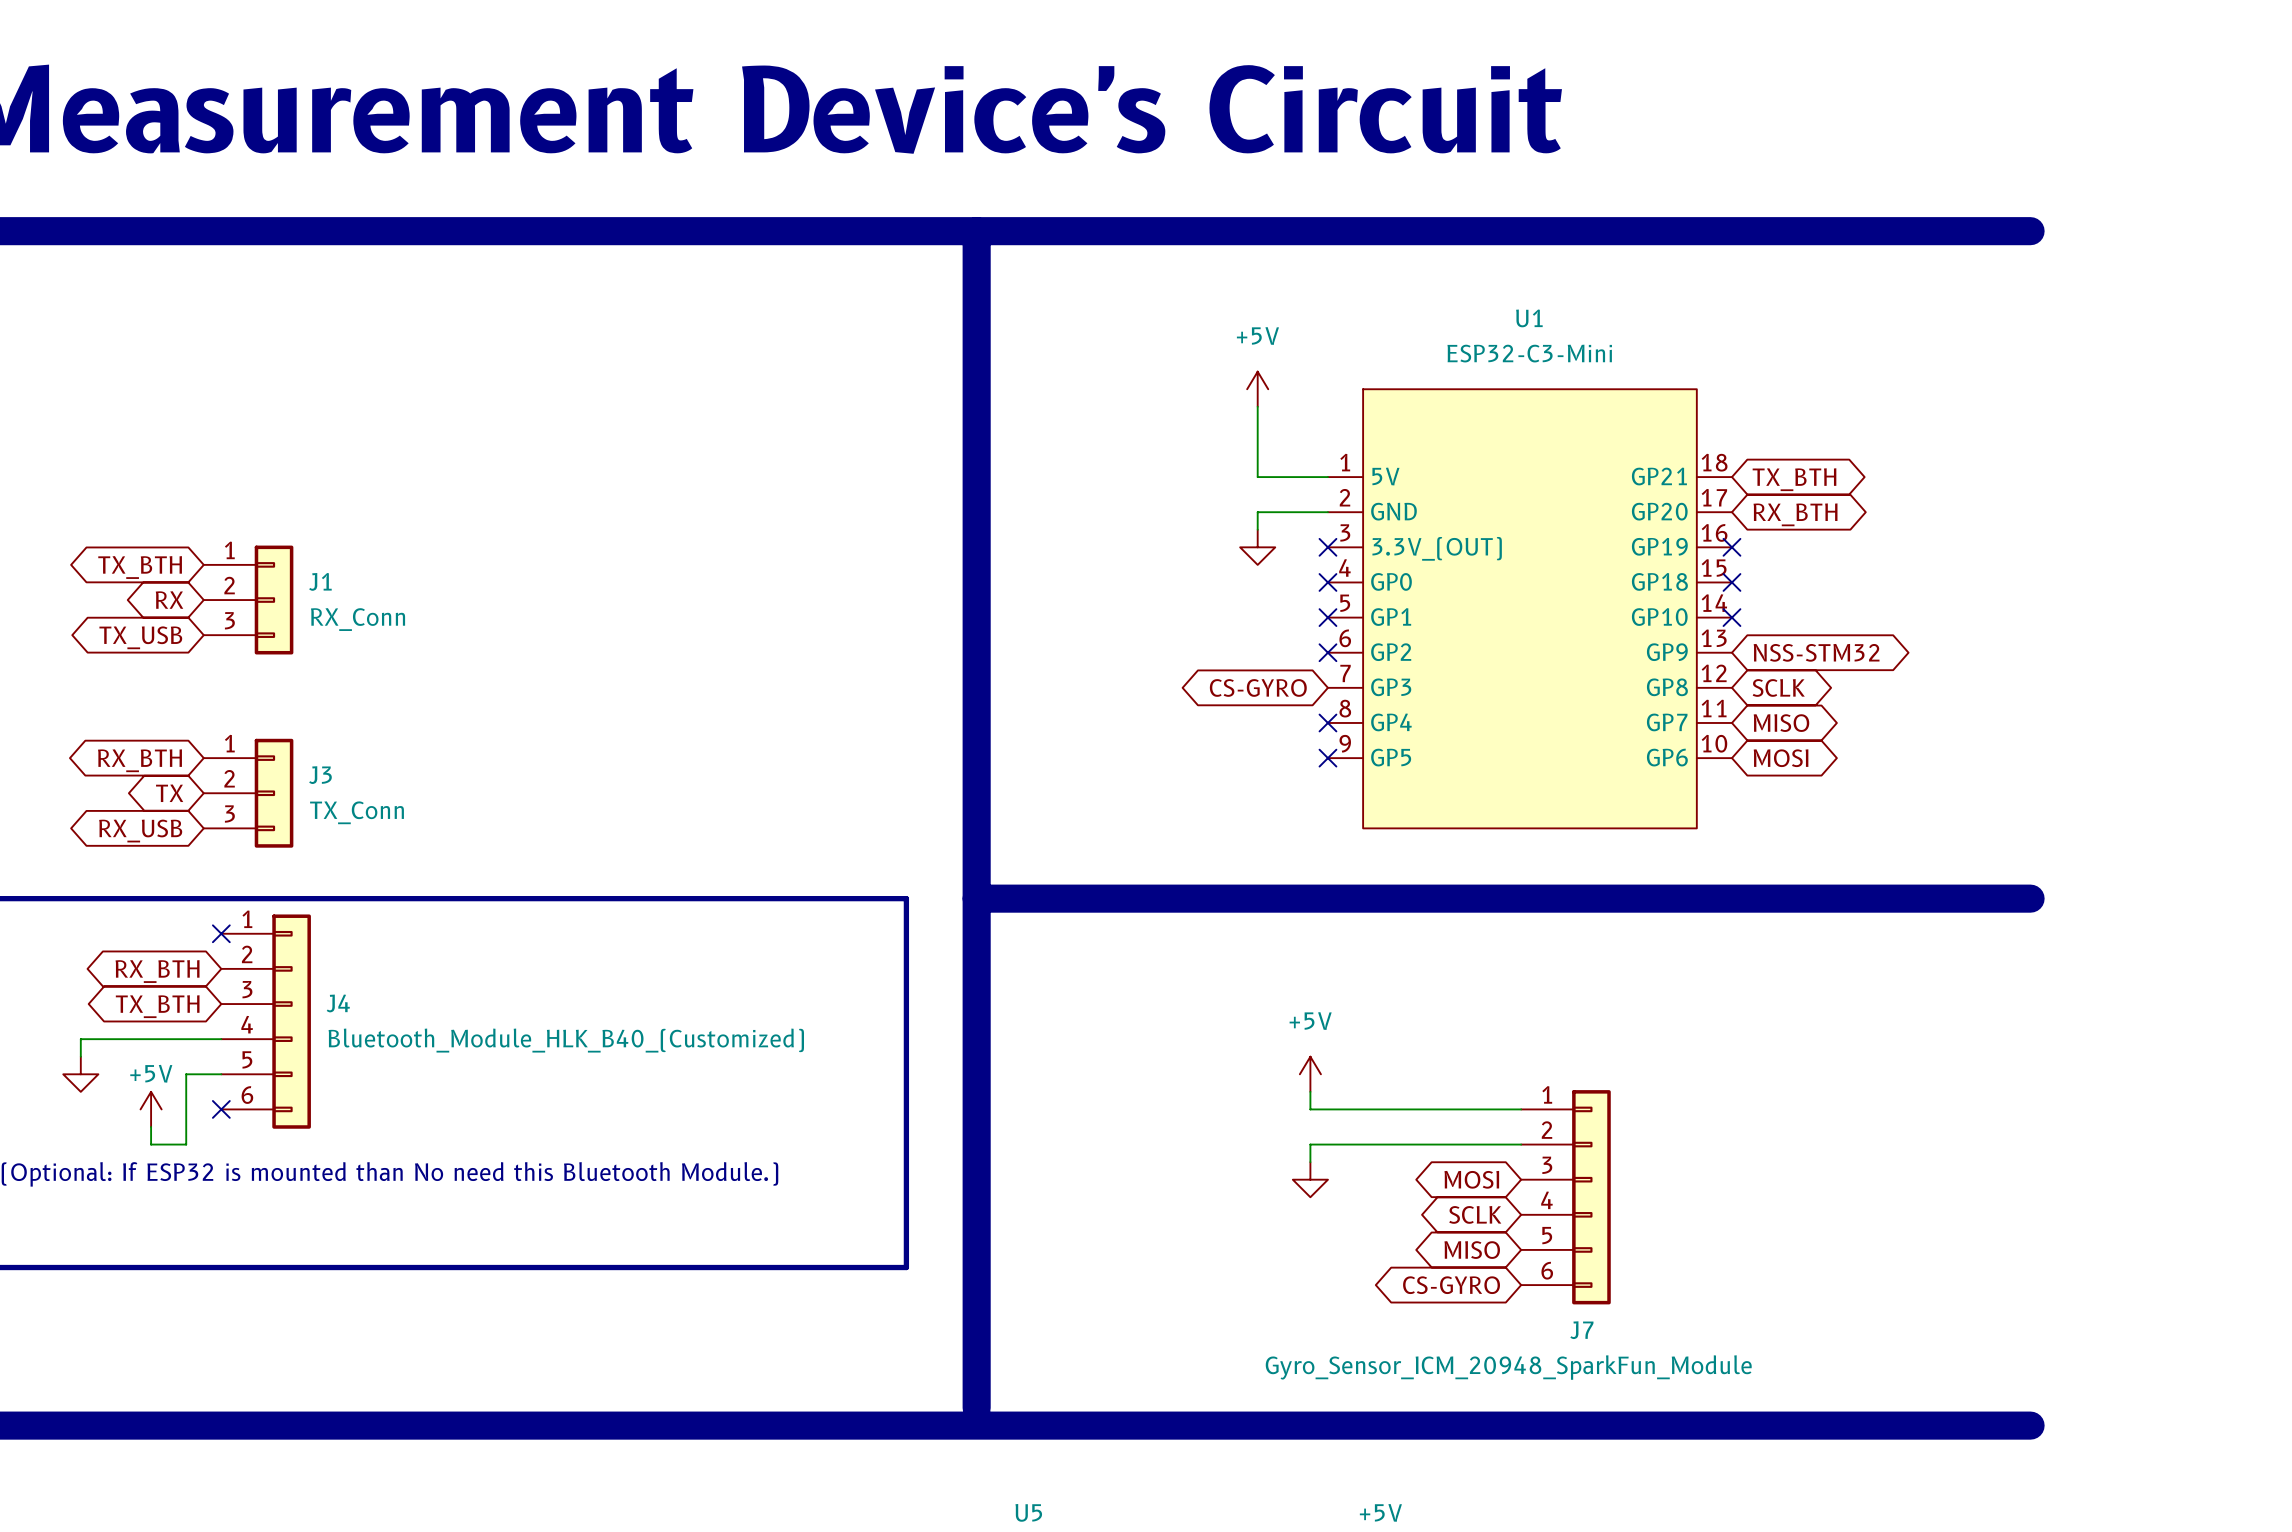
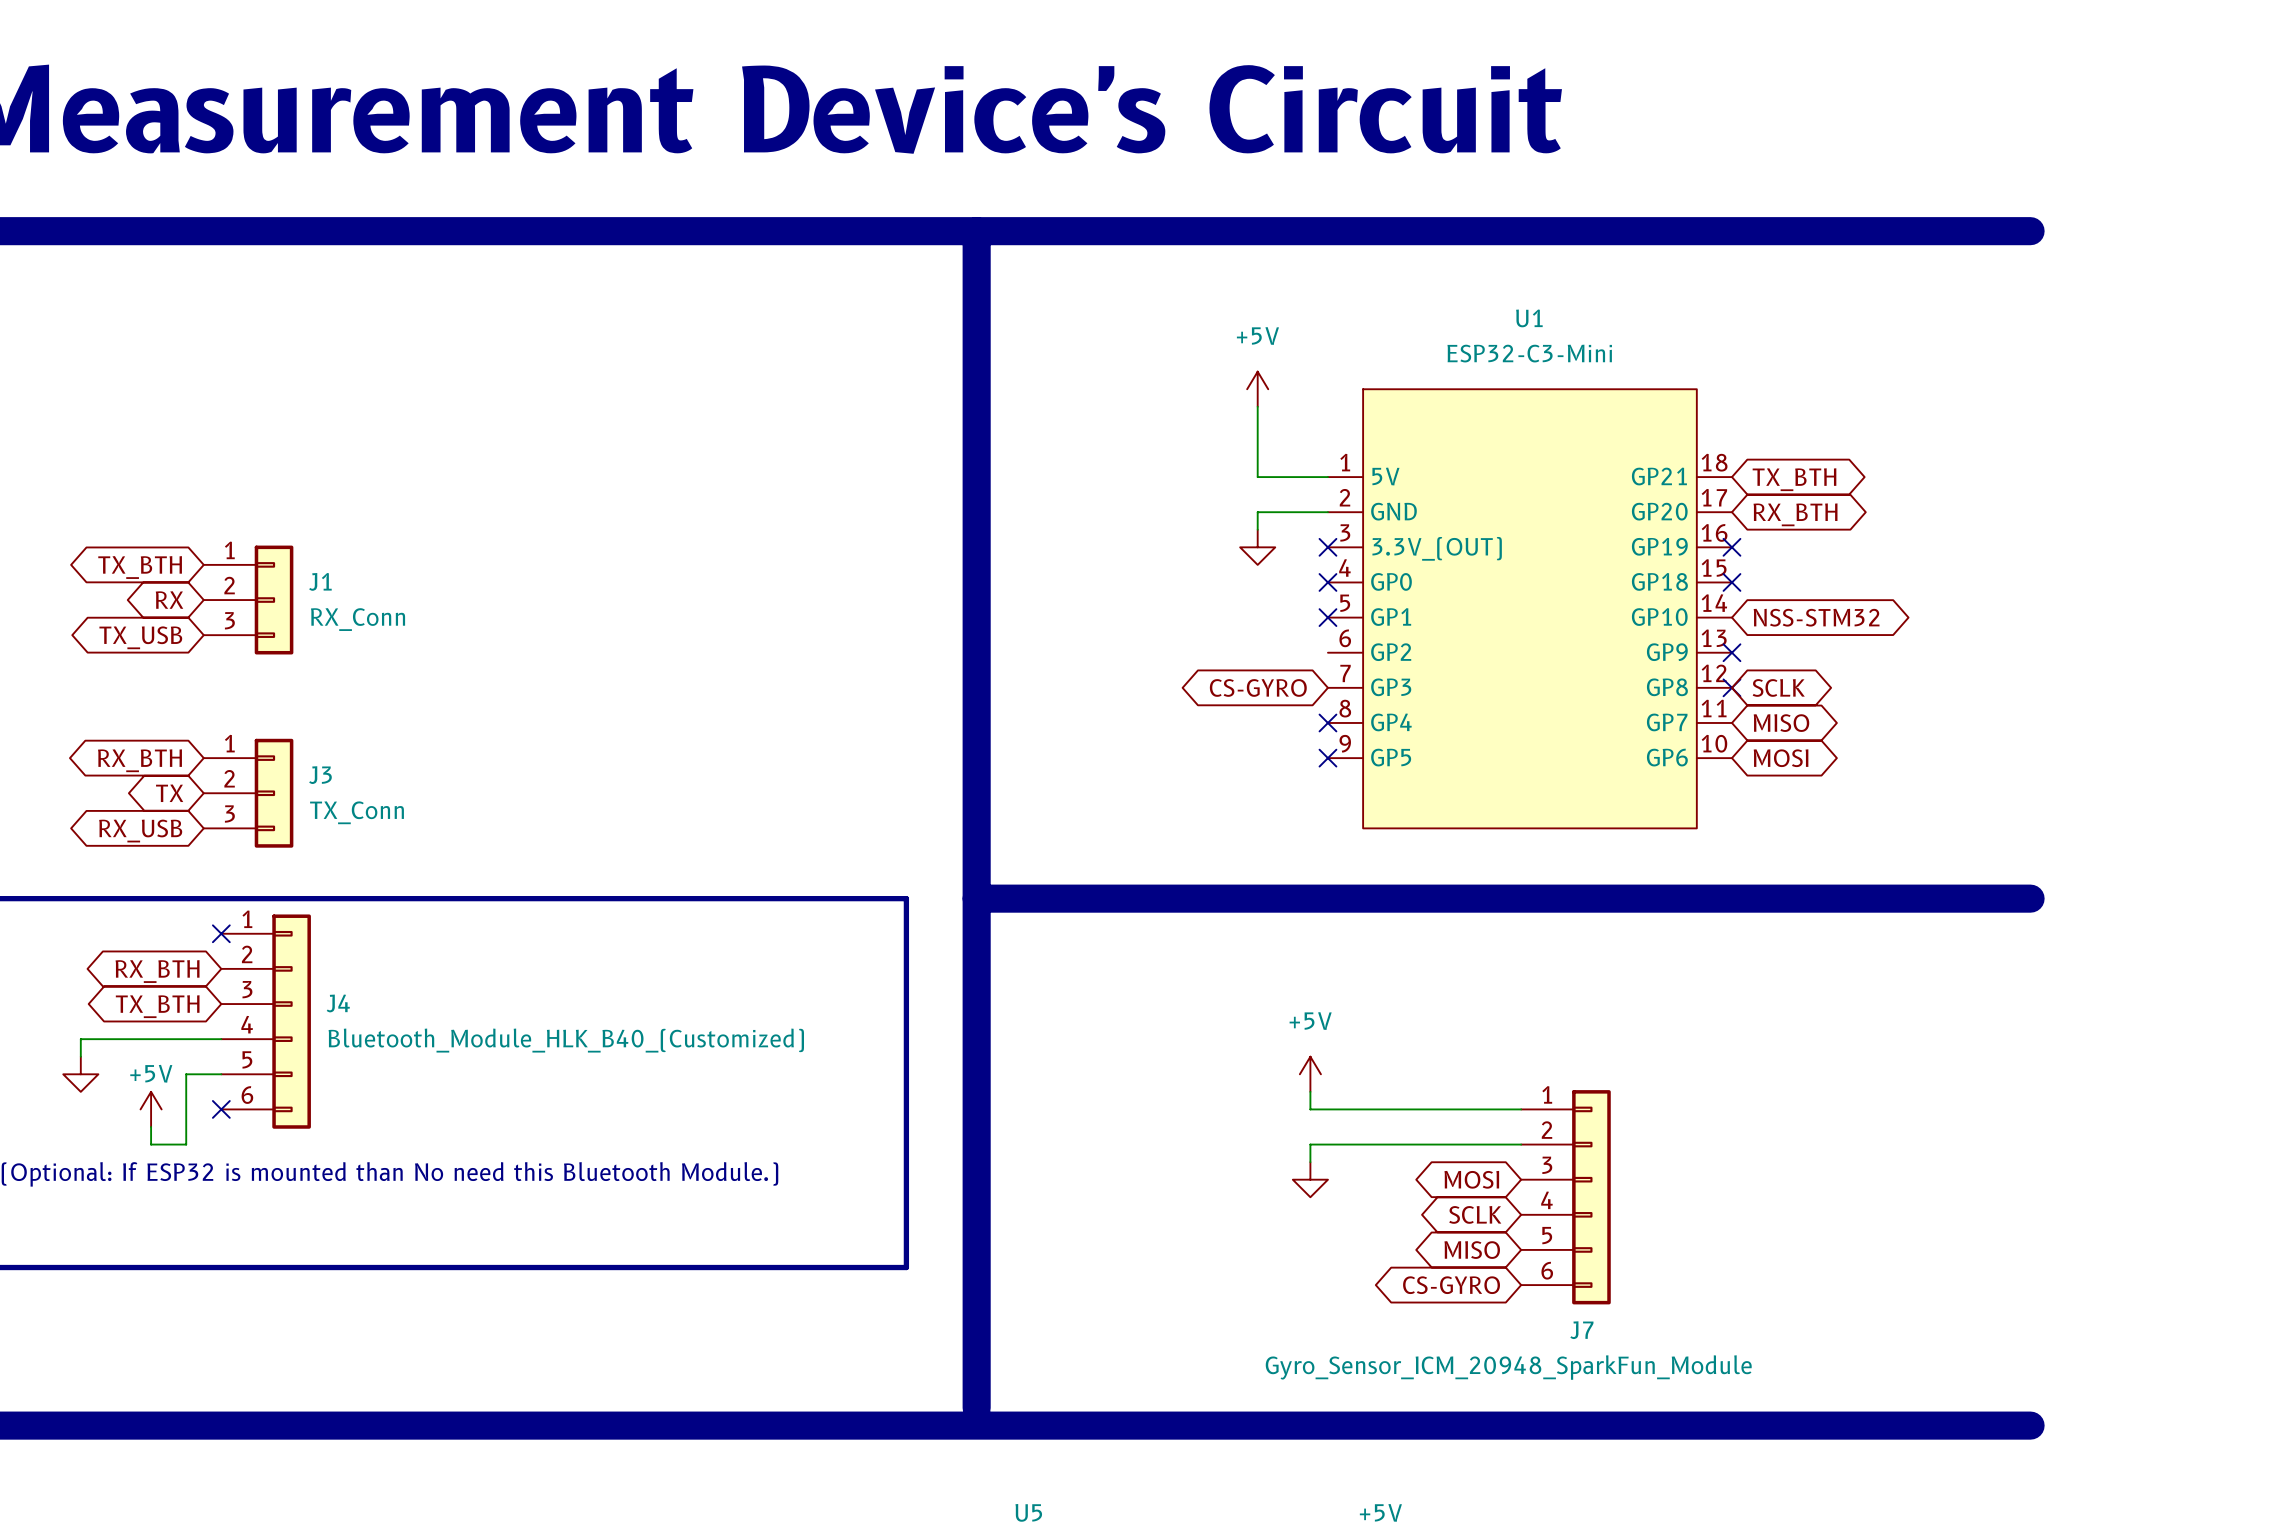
no-connect mark: (1731, 617) -> none
no-connect mark: (1327, 652) -> none
no-connect mark: none -> (1731, 652)
global label position: NSS-STM32 (1816, 652) -> NSS-STM32 (1816, 617)
no-connect mark: none -> (1731, 687)

